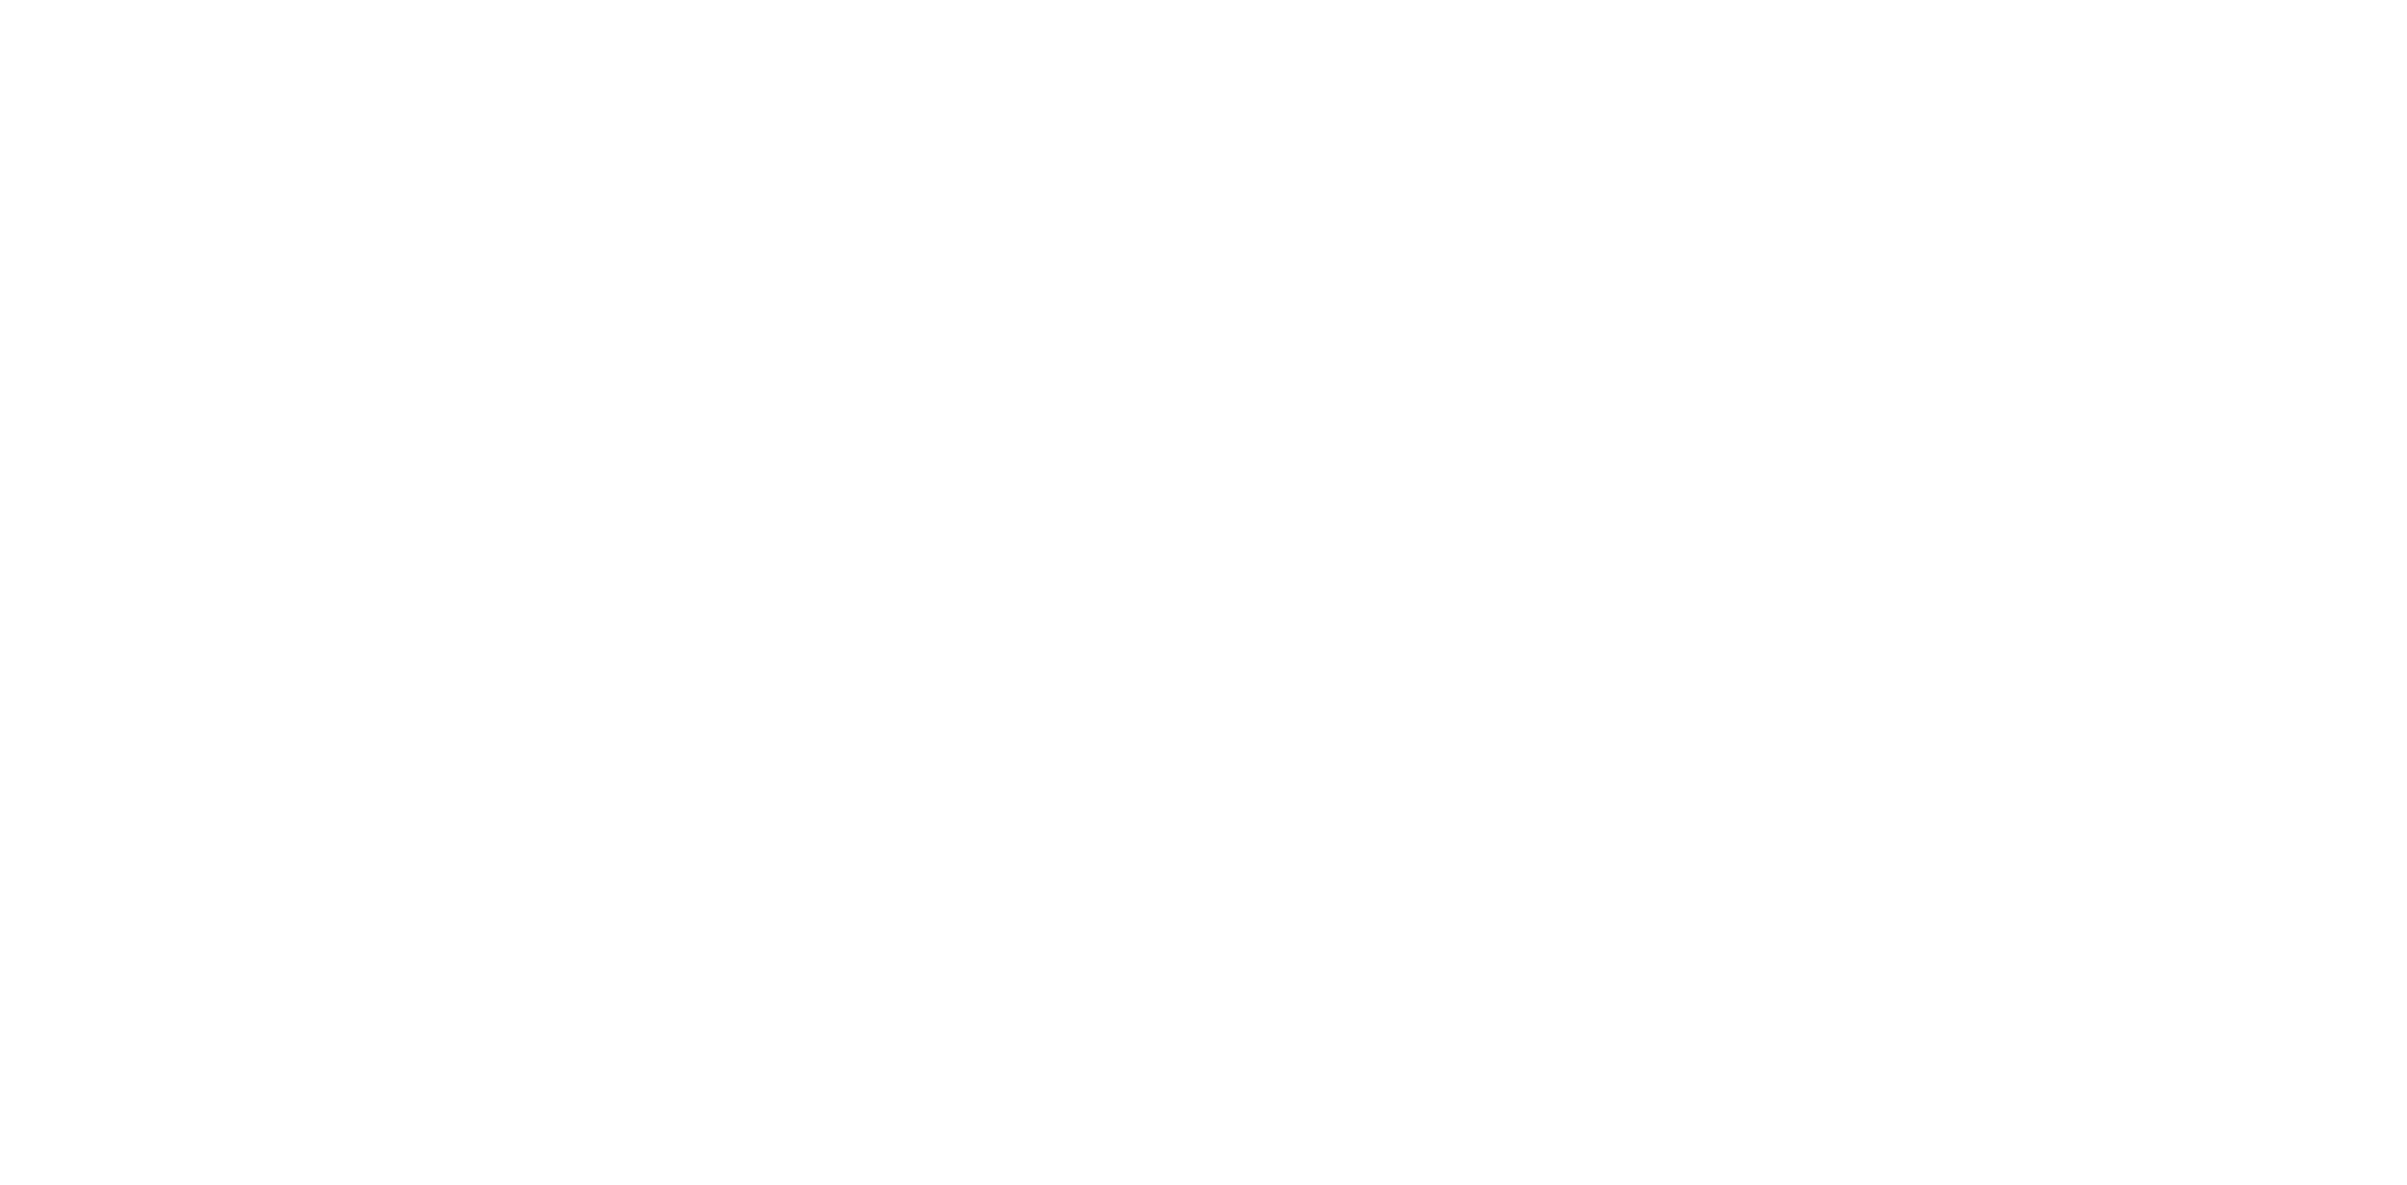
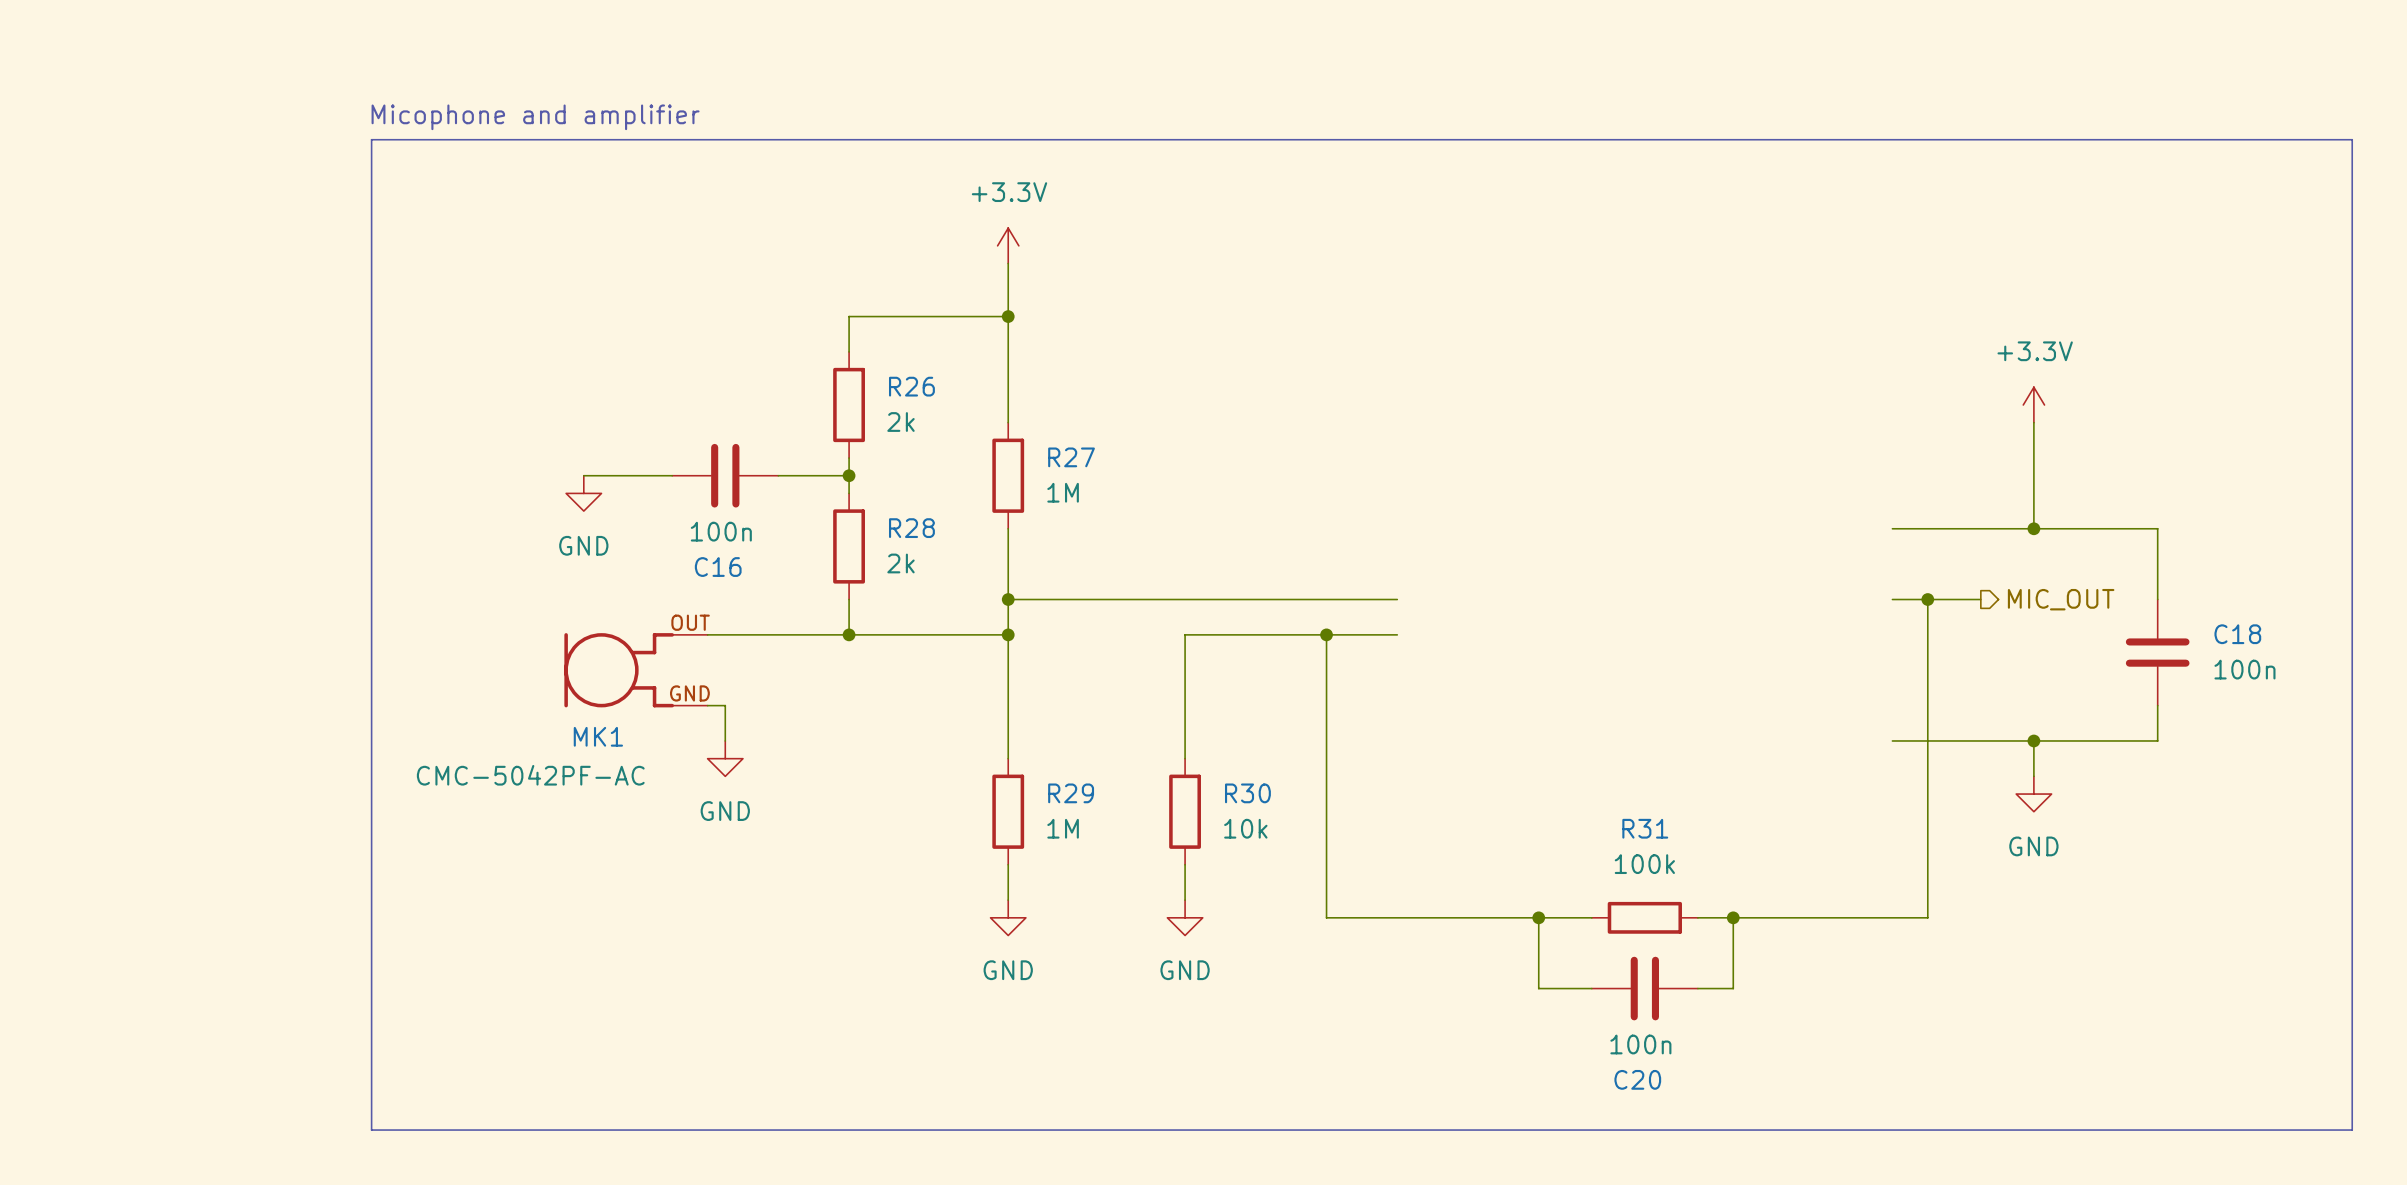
text: none -> Micophone and amplifier (535, 117)
line: none -> (371, 139) (2352, 139) (2352, 1130) (371, 1130) (371, 139)
power symbol: none -> +3.3V (1008, 245)
wire: none -> (1008, 263) (1008, 422)
wire: none -> (1008, 316) (849, 316) (849, 351)
junction: none -> (1008, 316)
R26: none -> 2k (849, 404)
power symbol: none -> +3.3V (2033, 404)
wire: none -> (2033, 422) (2033, 528)
wire: none -> (849, 458) (849, 493)
wire: none -> (583, 475) (672, 475)
C16: none -> 100n (725, 475)
wire: none -> (778, 475) (849, 475)
junction: none -> (849, 475)
R27: none -> 1M (1008, 475)
power symbol: none -> GND (583, 493)
wire: none -> (1008, 528) (1008, 758)
wire: none -> (1892, 528) (2157, 528) (2157, 599)
junction: none -> (2033, 528)
R28: none -> 2k (849, 546)
wire: none -> (849, 599) (849, 634)
wire: none -> (1008, 599) (1397, 599)
junction: none -> (1008, 599)
wire: none -> (1892, 599) (1980, 599)
wire: none -> (1927, 599) (1927, 917) (1697, 917)
junction: none -> (1927, 599)
hierarchical label: none -> MIC_OUT (2061, 599)
wire: none -> (707, 634) (1008, 634)
junction: none -> (849, 634)
junction: none -> (1008, 634)
wire: none -> (1326, 634) (1326, 917) (1591, 917)
junction: none -> (1326, 634)
wire: none -> (1397, 634) (1185, 634) (1185, 758)
C18: none -> 100n (2157, 652)
MK1: none -> CMC-5042PF-AC (635, 670)
wire: none -> (707, 705) (725, 705) (725, 740)
wire: none -> (2157, 705) (2157, 740) (1892, 740)
wire: none -> (2033, 740) (2033, 776)
junction: none -> (2033, 740)
power symbol: none -> GND (725, 758)
power symbol: none -> GND (2033, 794)
R29: none -> 1M (1008, 811)
R30: none -> 10k (1185, 811)
wire: none -> (1008, 864) (1008, 900)
wire: none -> (1185, 864) (1185, 900)
power symbol: none -> GND (1008, 917)
power symbol: none -> GND (1185, 917)
wire: none -> (1538, 917) (1538, 988) (1591, 988)
junction: none -> (1538, 917)
R31: none -> 100k (1644, 917)
wire: none -> (1733, 917) (1733, 988) (1697, 988)
junction: none -> (1733, 917)
C20: none -> 100n (1644, 988)

